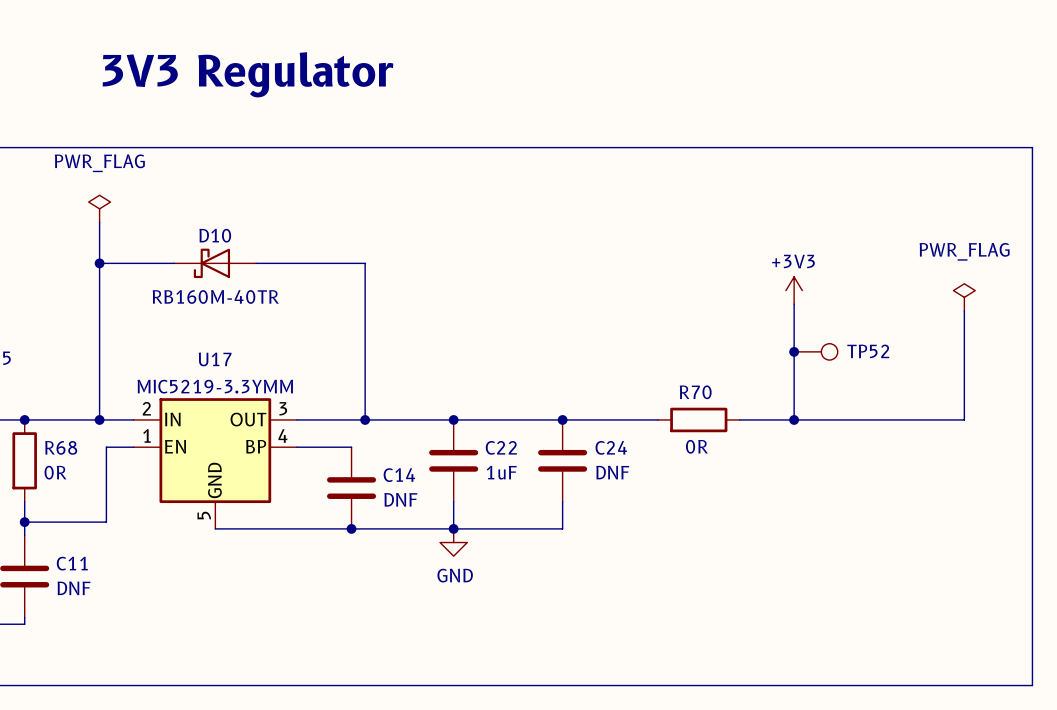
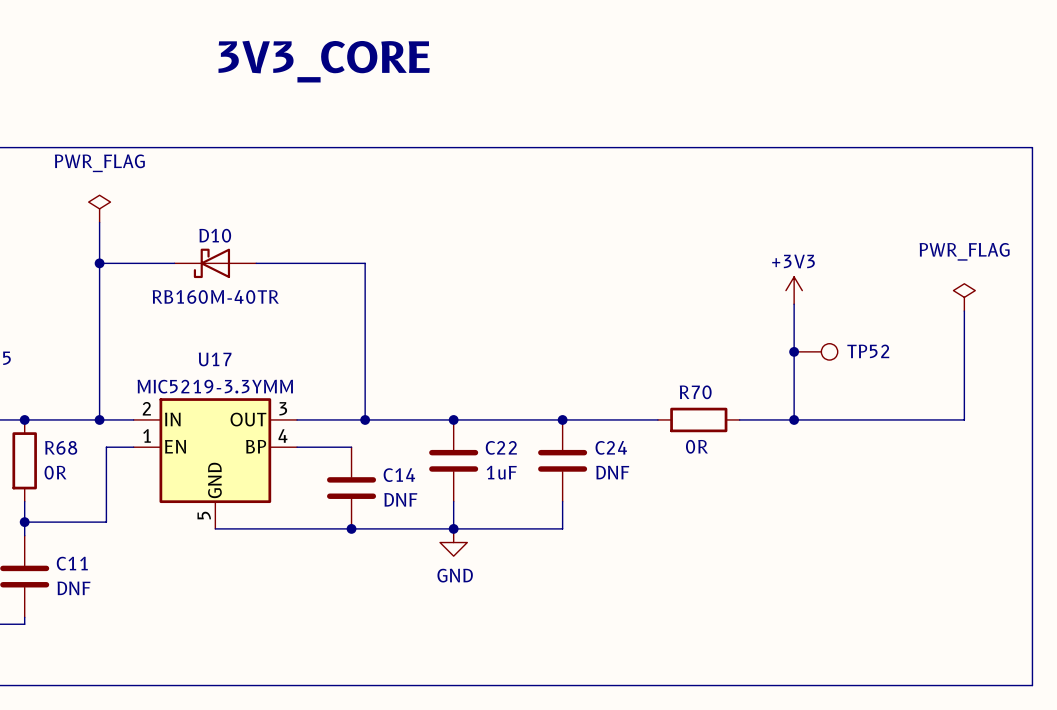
text: none -> 3V3_CORE (324, 61)
text: 3V3 Regulator (248, 74) -> none

